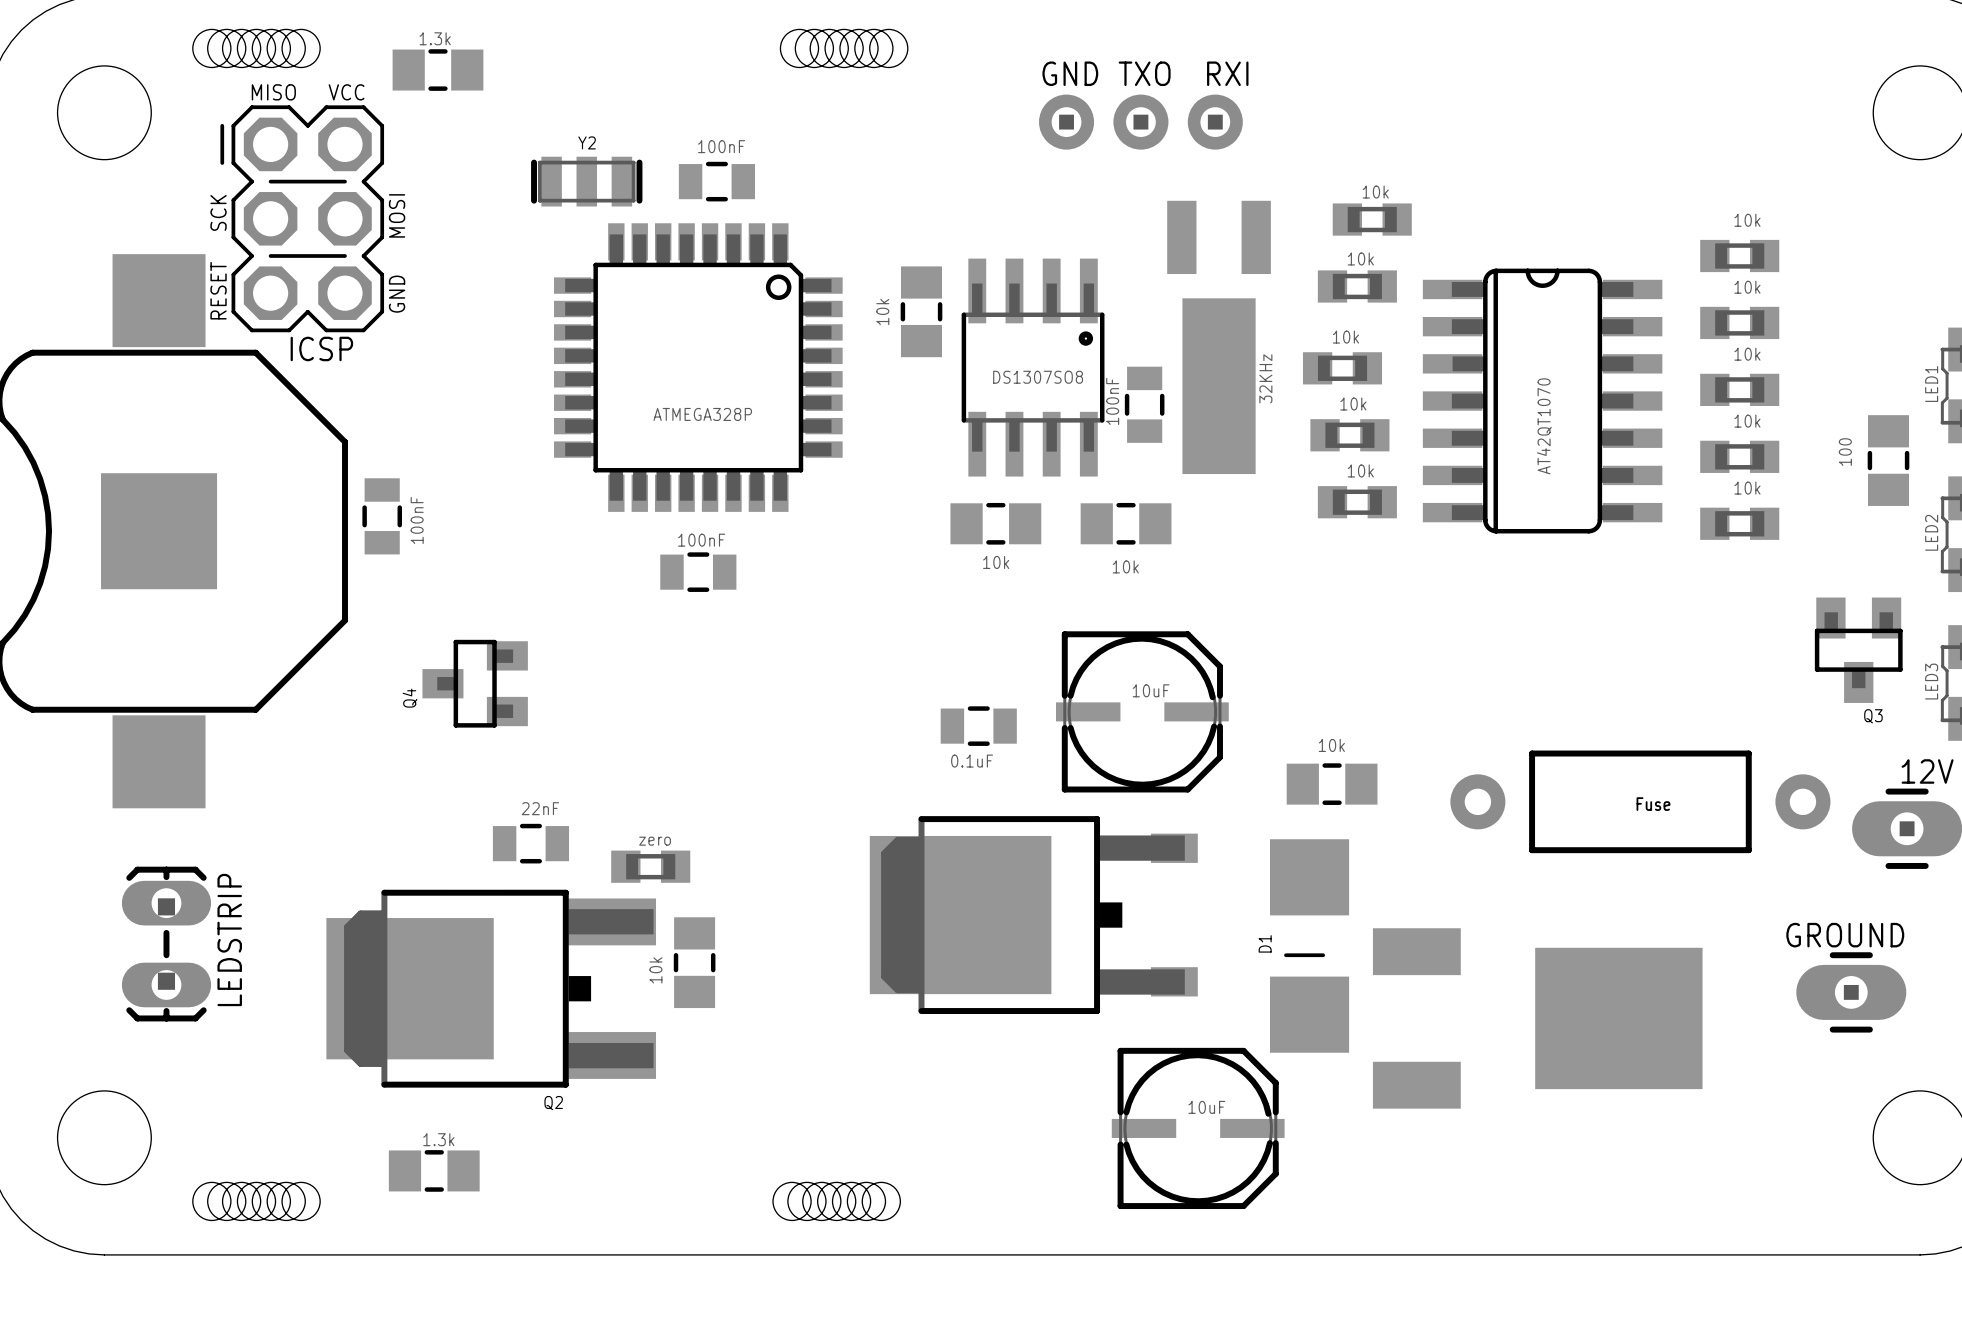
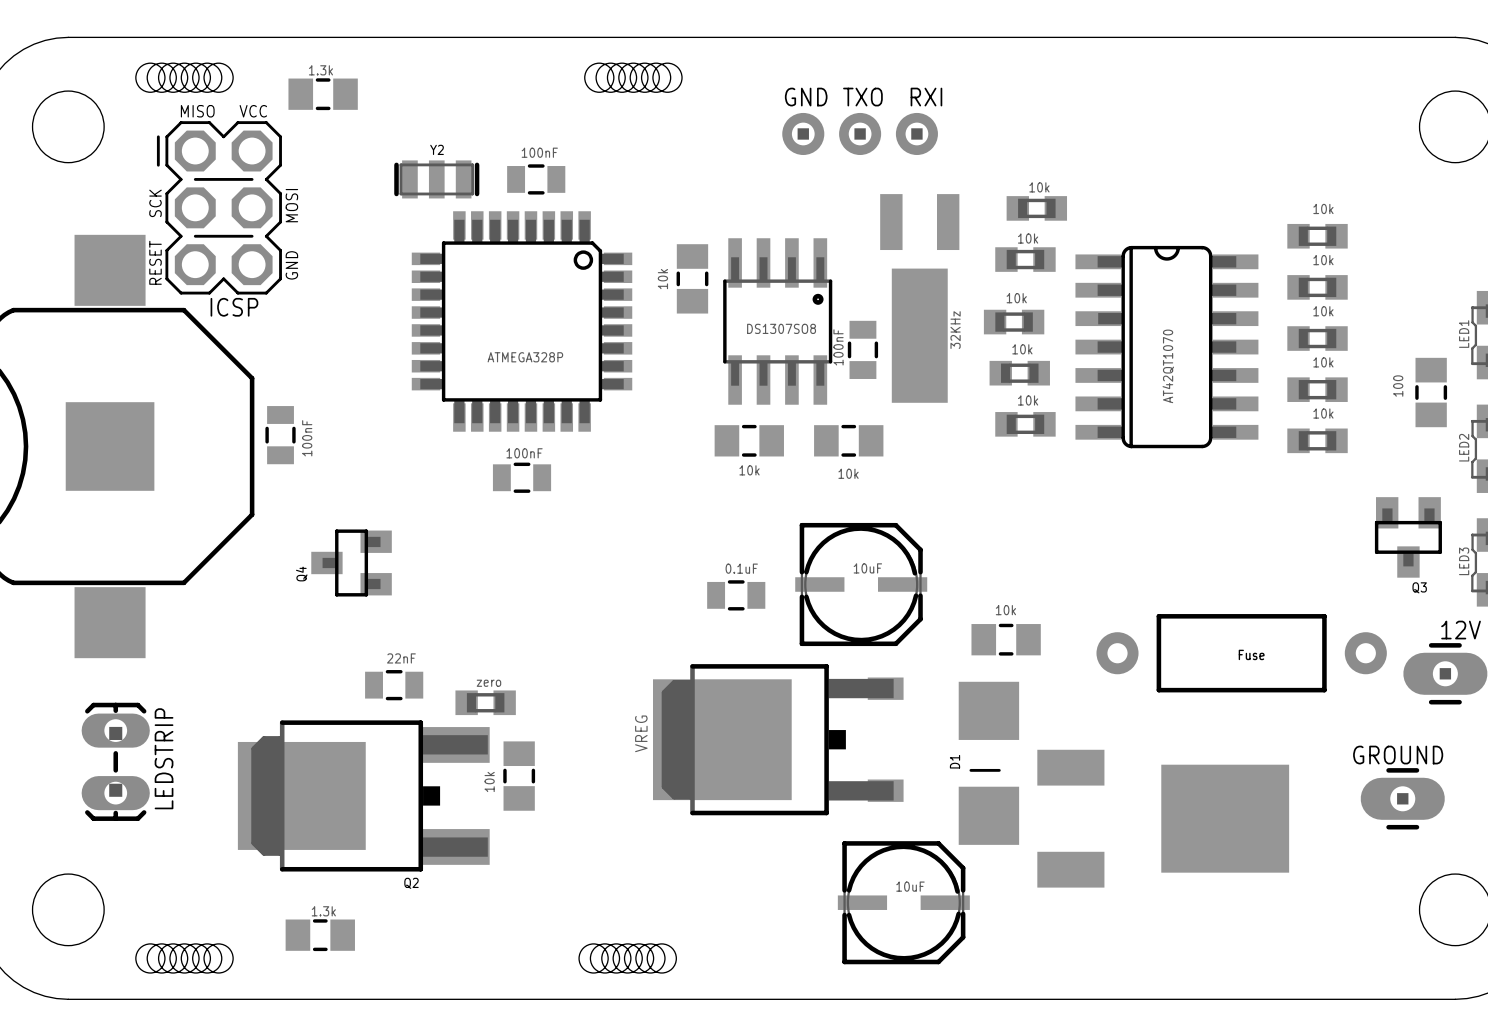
part value position: 0.1uF (972, 761) -> 0.1uF (741, 568)
part text: none -> VREG (641, 733)

